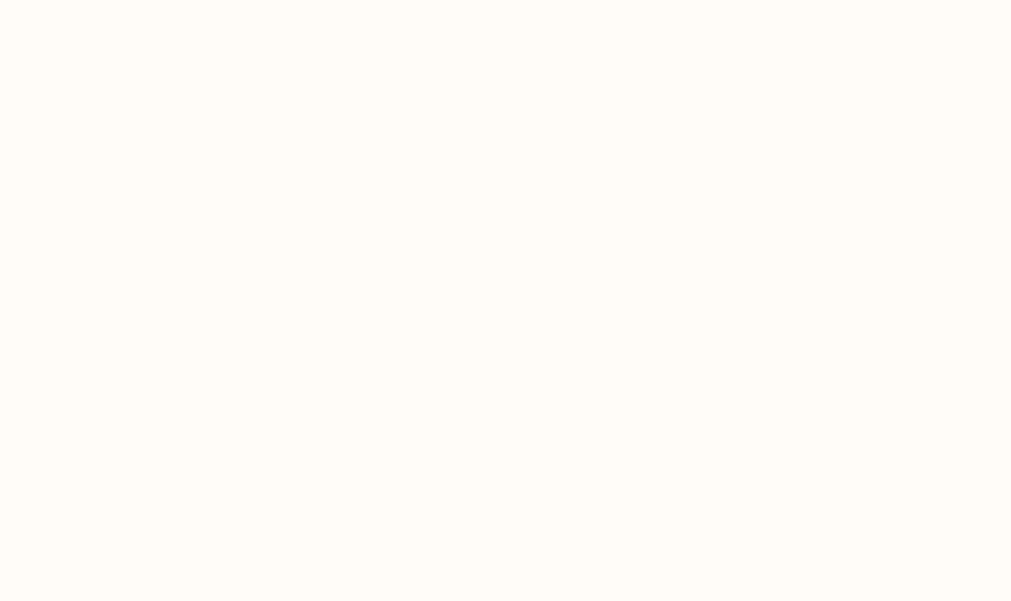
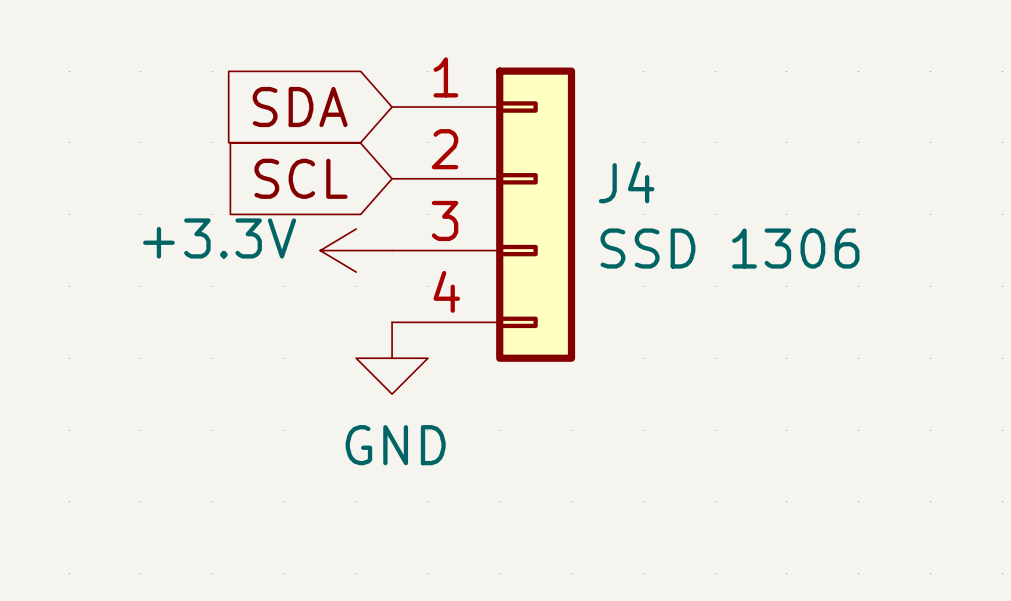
global label: none -> SDA (300, 107)
global label: none -> SCL (301, 178)
J4: none -> SSD 1306 (483, 214)
power symbol: none -> +3.3V (356, 250)
power symbol: none -> GND (392, 358)

